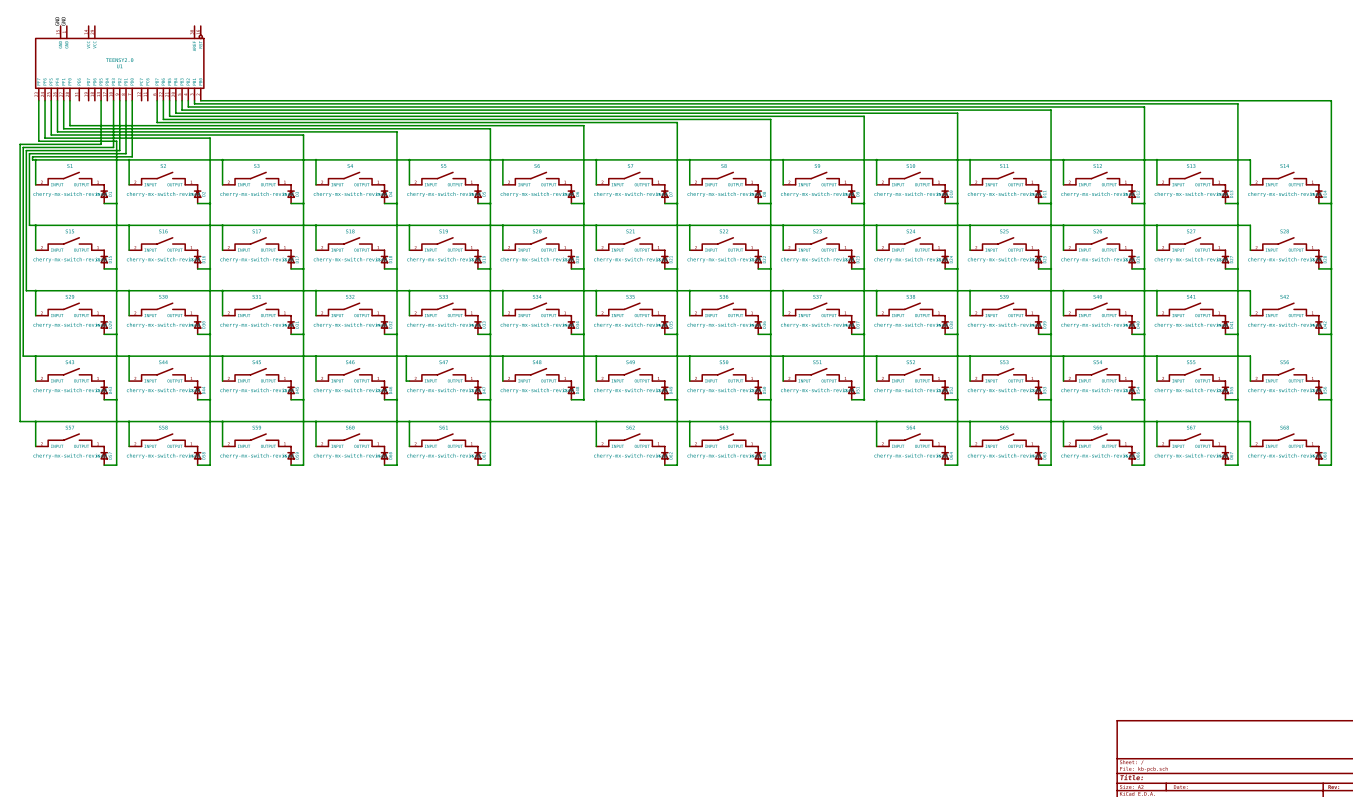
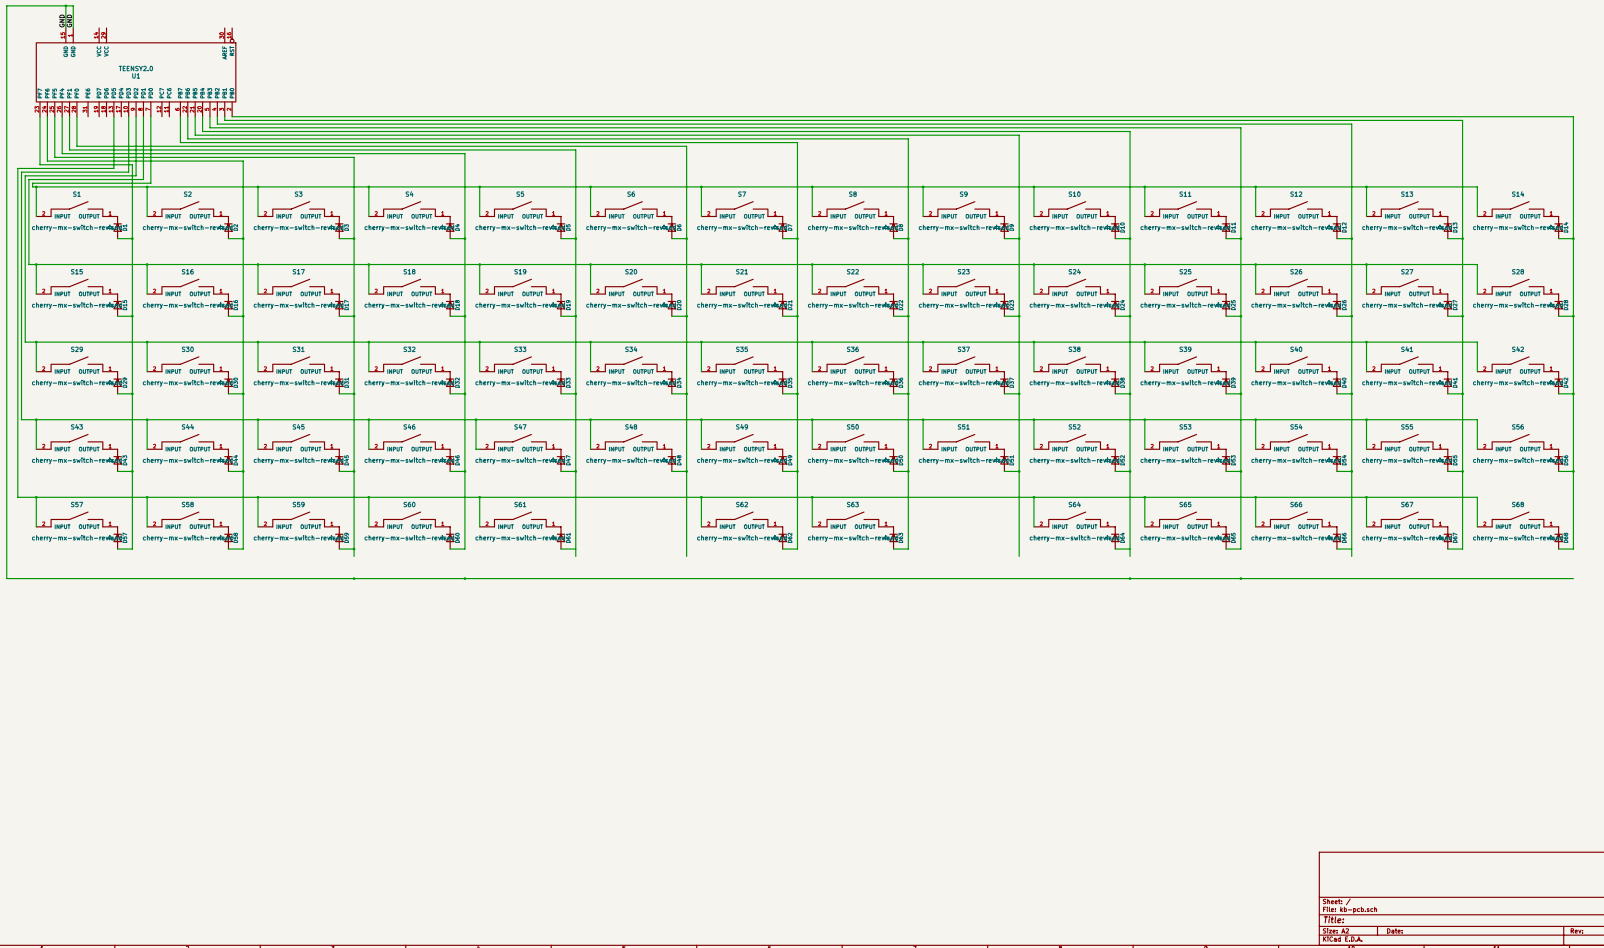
wire: none -> (65, 5) (65, 28)
wire: none -> (73, 28) (73, 5) (6, 5) (6, 578) (1573, 578)
wire: none -> (686, 471) (686, 556)
wire: none -> (1019, 471) (1019, 556)
wire: none -> (354, 549) (354, 556)
wire: none -> (575, 549) (575, 556)
wire: none -> (1130, 549) (1130, 556)
wire: none -> (1351, 549) (1351, 556)
junction: none -> (354, 578)
junction: none -> (464, 578)
junction: none -> (1130, 578)
junction: none -> (1240, 578)

